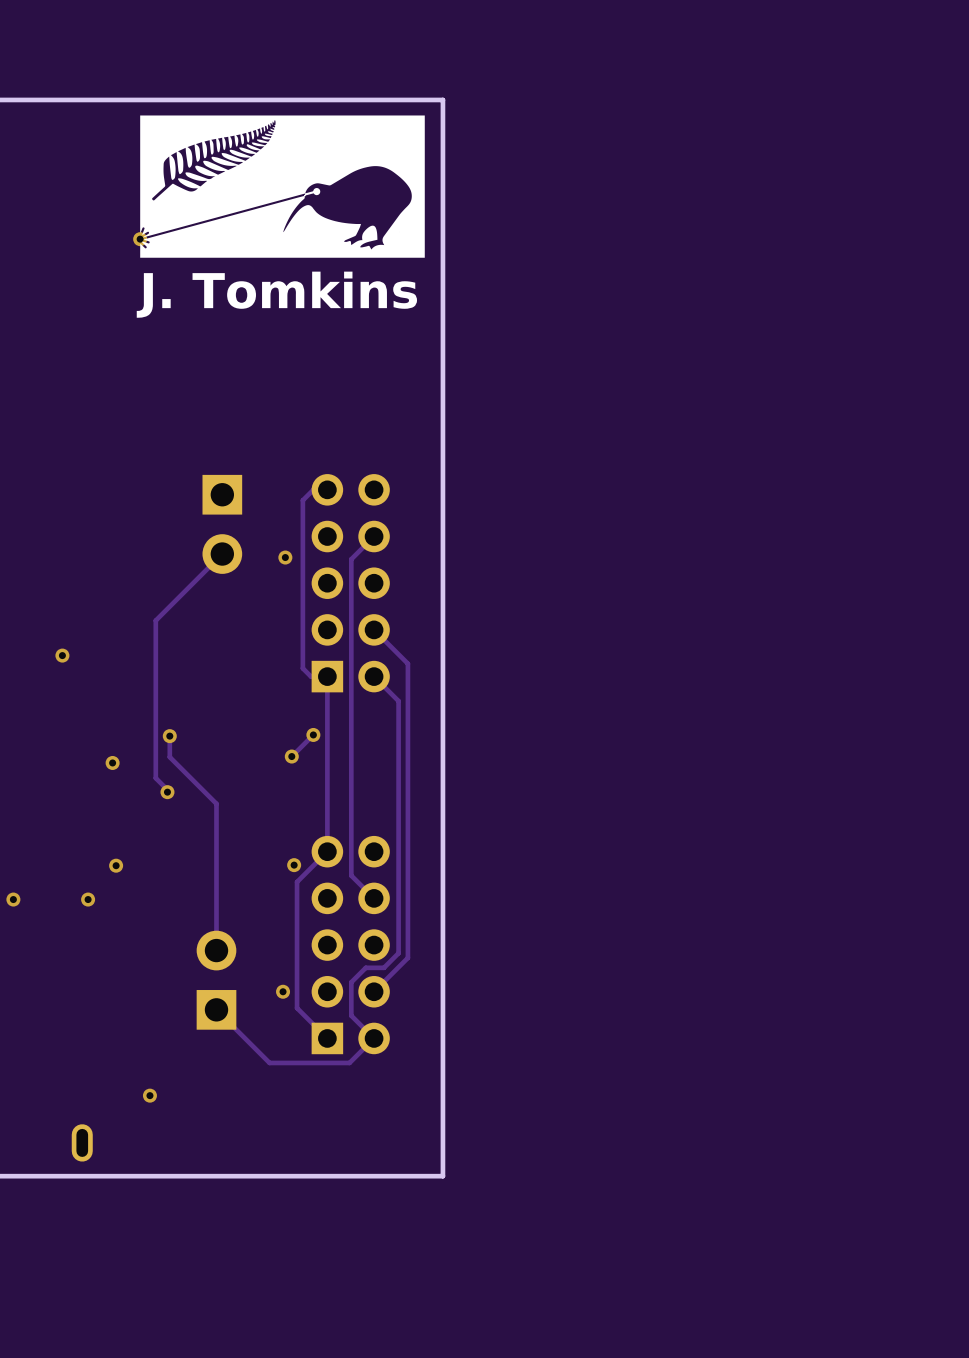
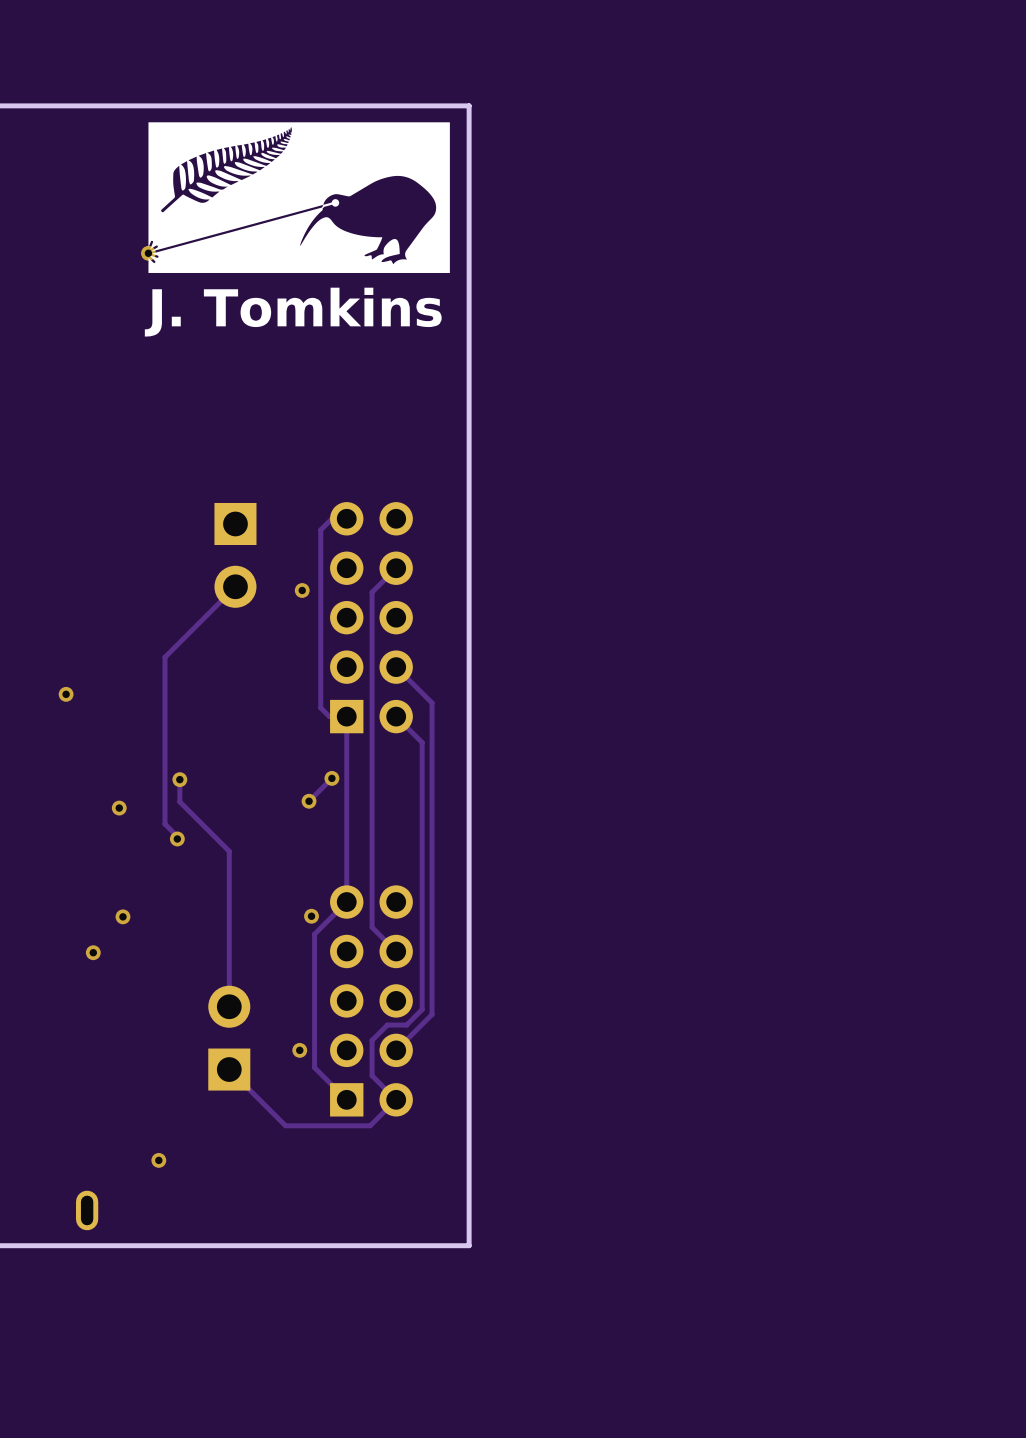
via: (13, 899) -> none

